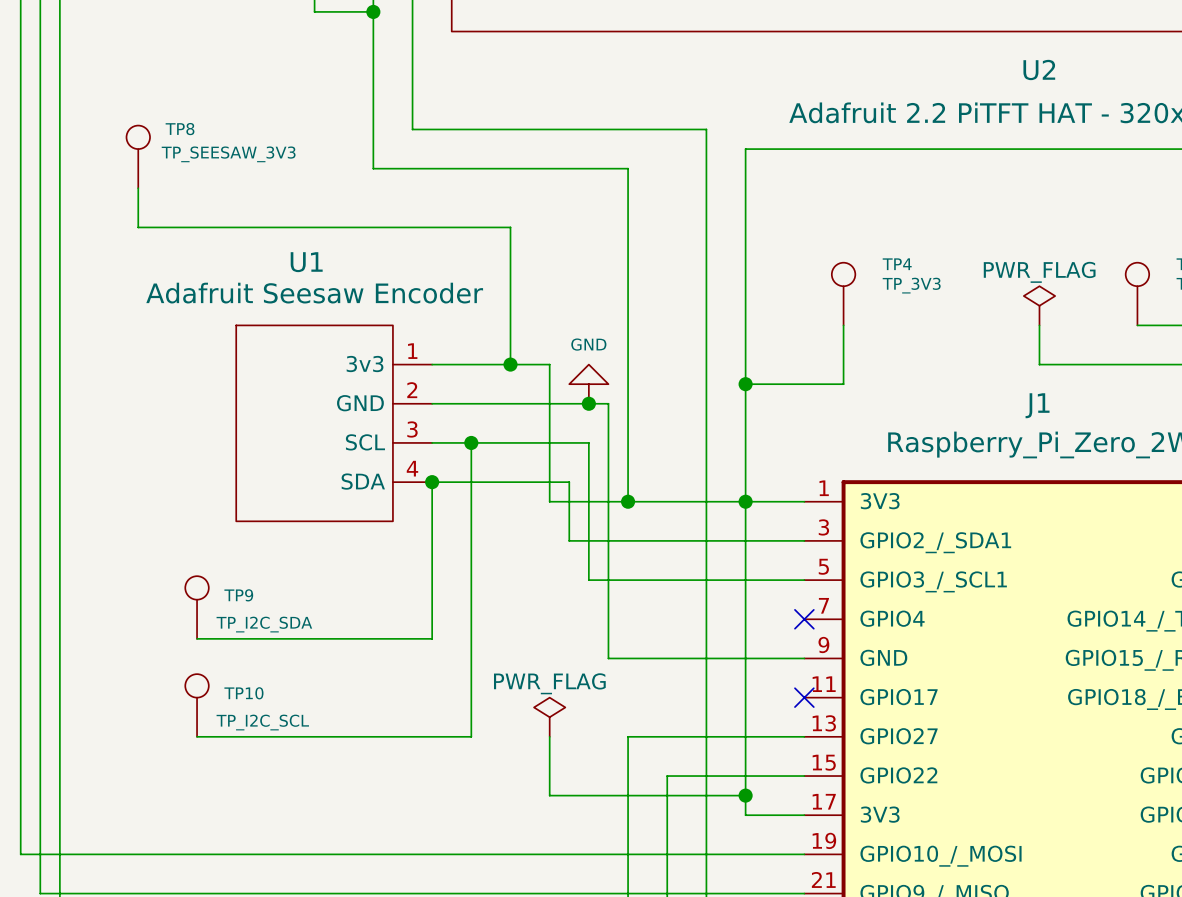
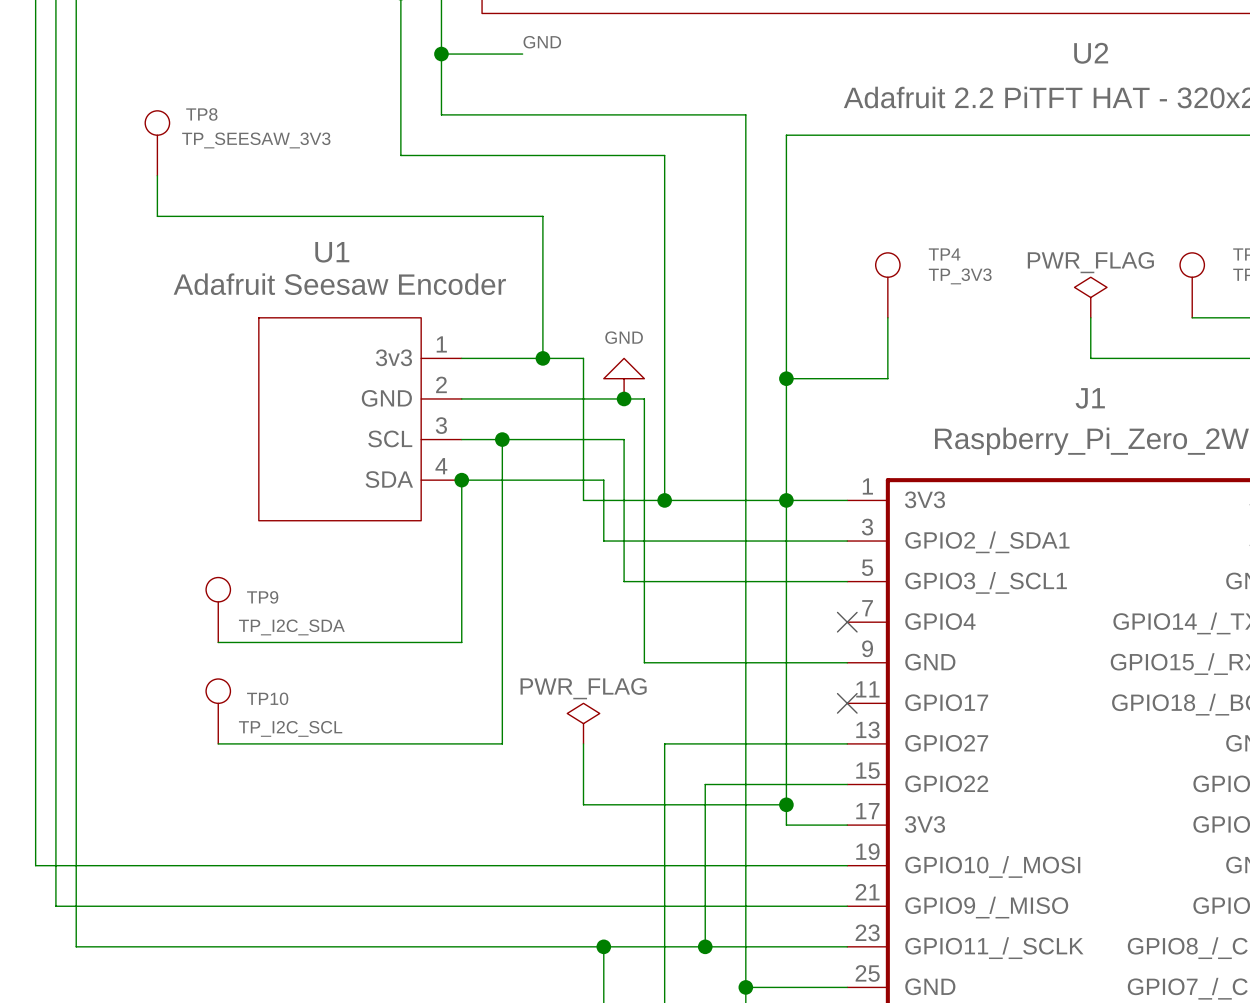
label: none -> GND (542, 42)
wire: none -> (441, 54) (522, 54)
junction: none -> (441, 54)

